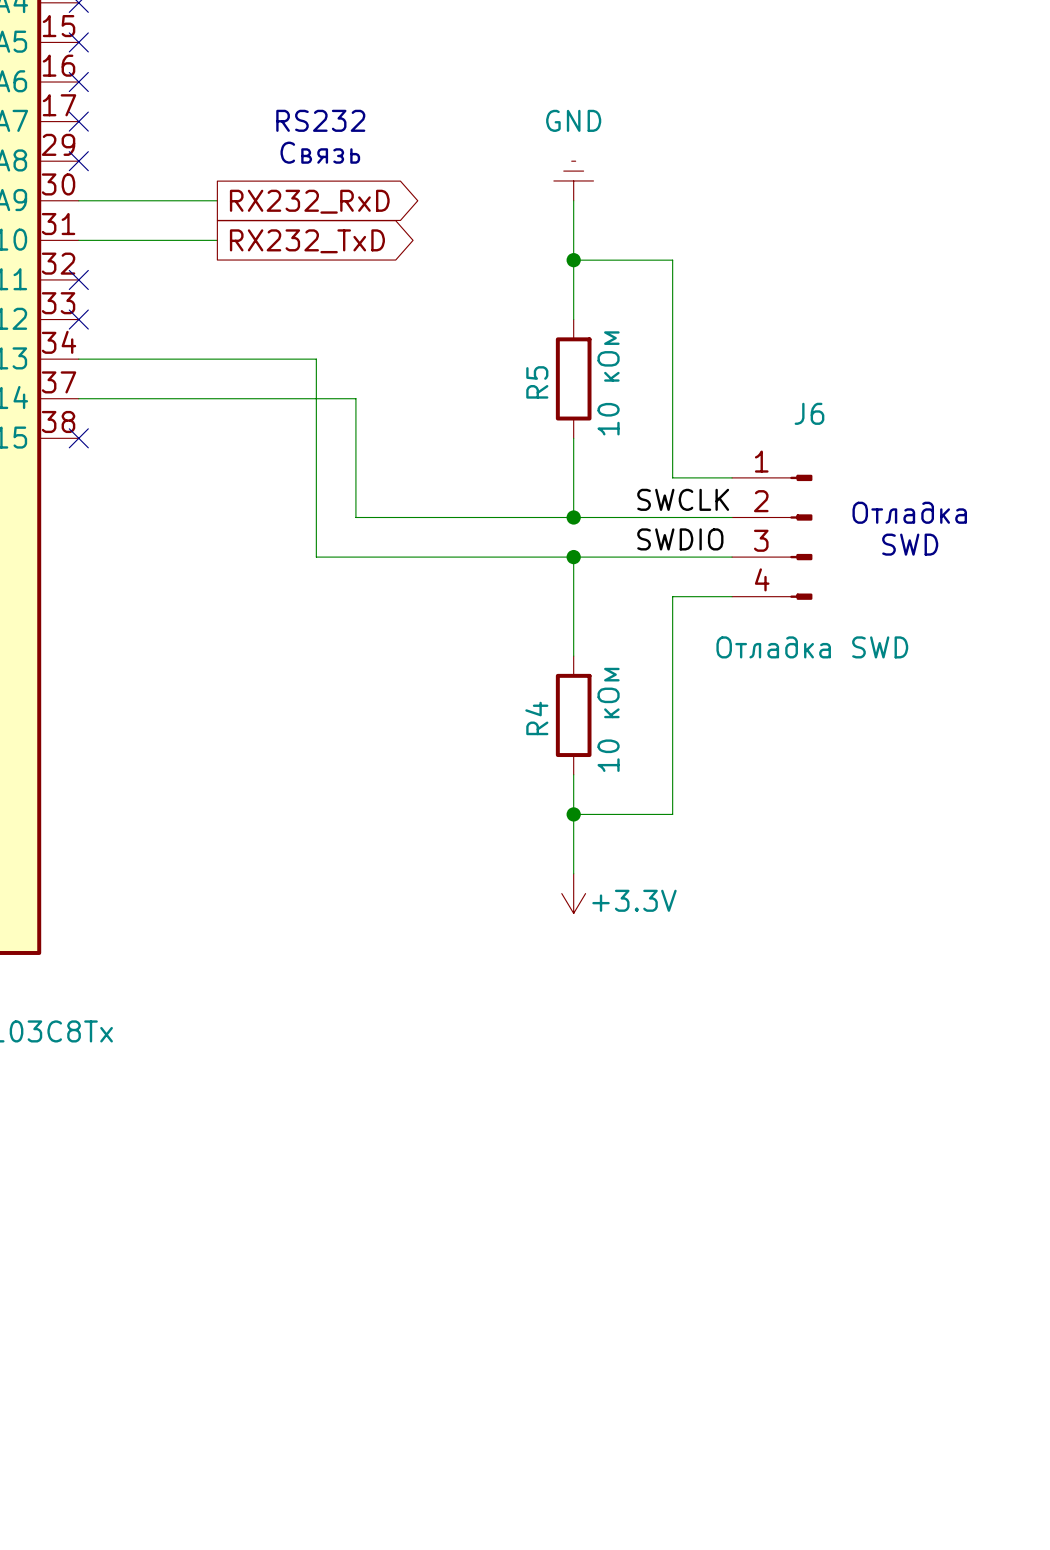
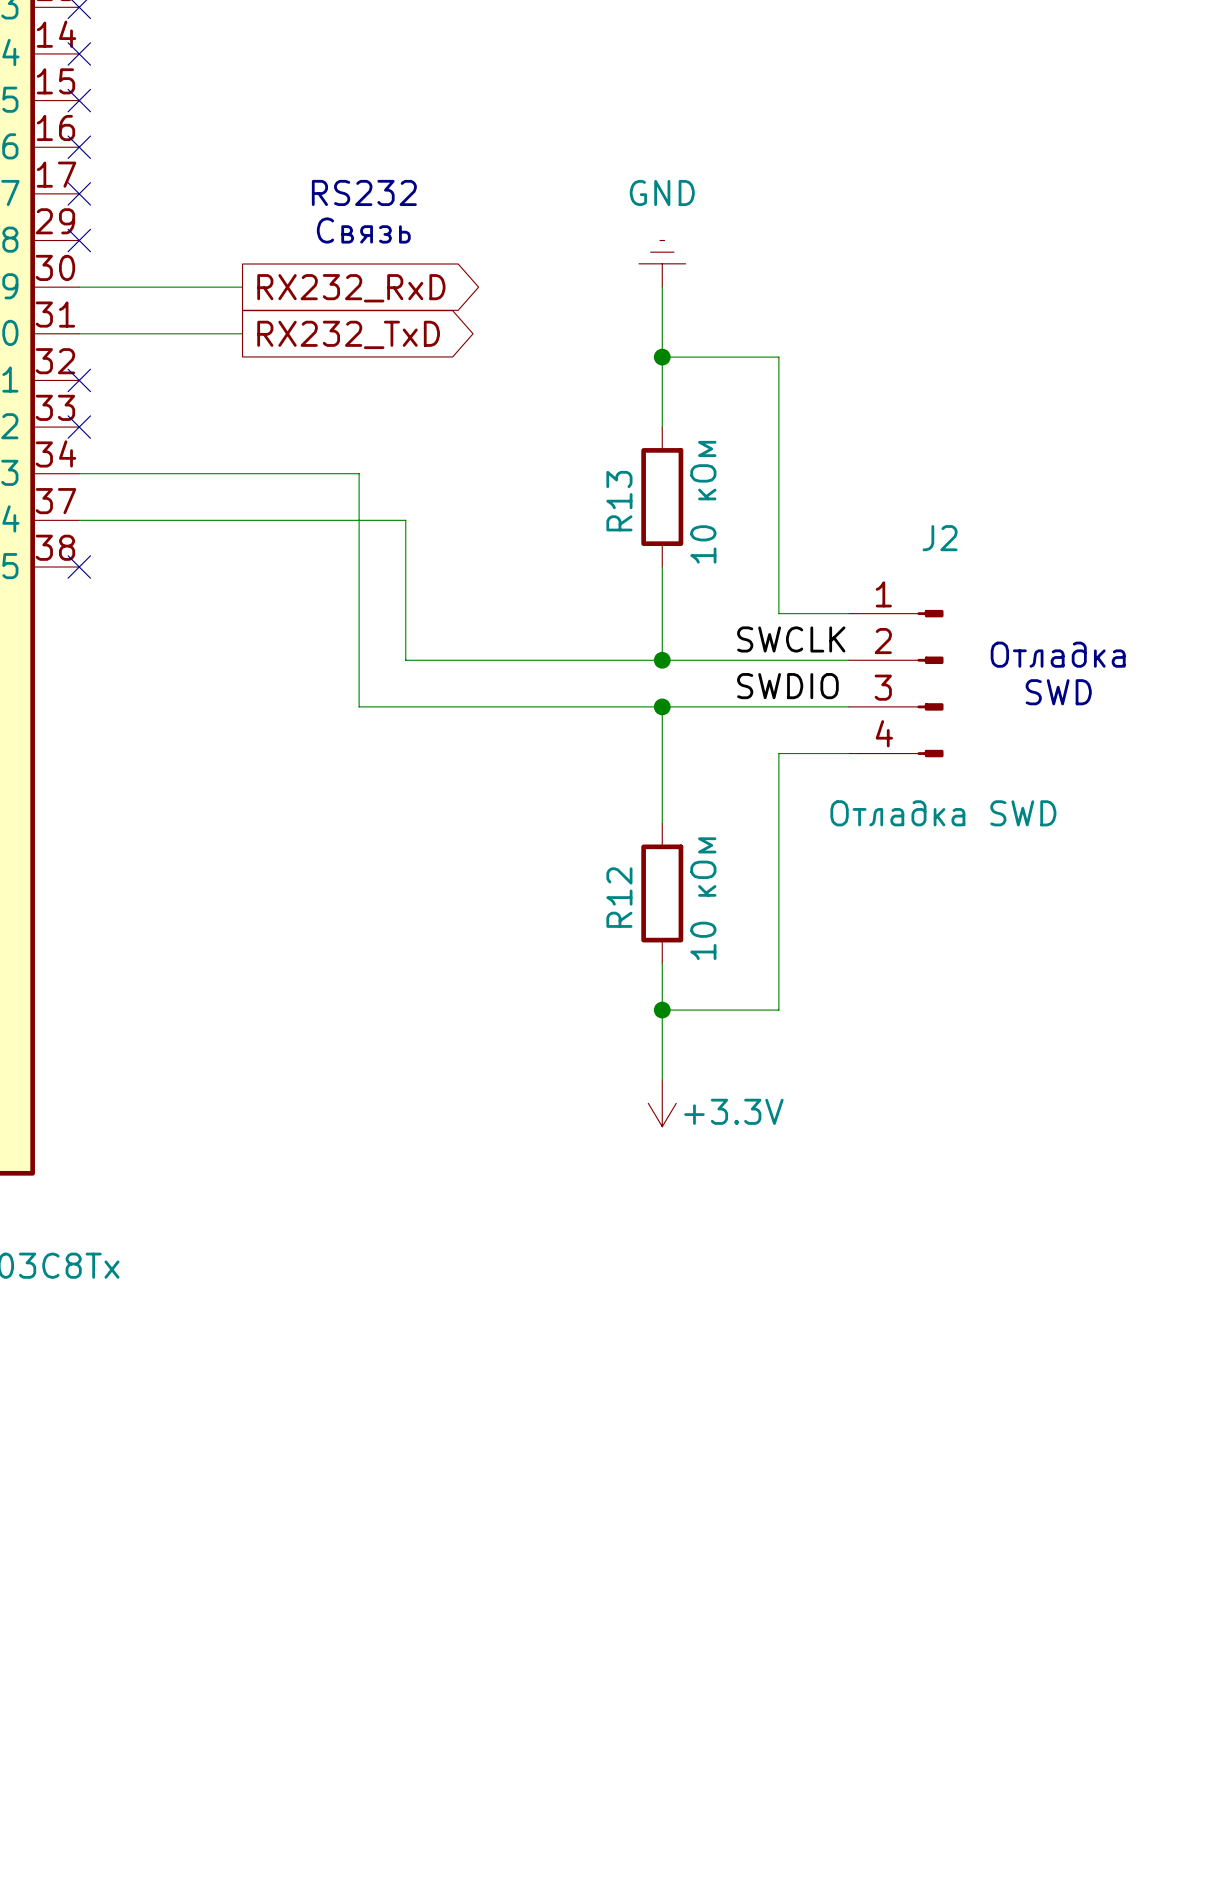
R5 name: R5 (537, 382) -> R13 (619, 501)
J6 name: J6 (809, 413) -> J2 (940, 538)
R4 name: R4 (536, 718) -> R12 (619, 897)

